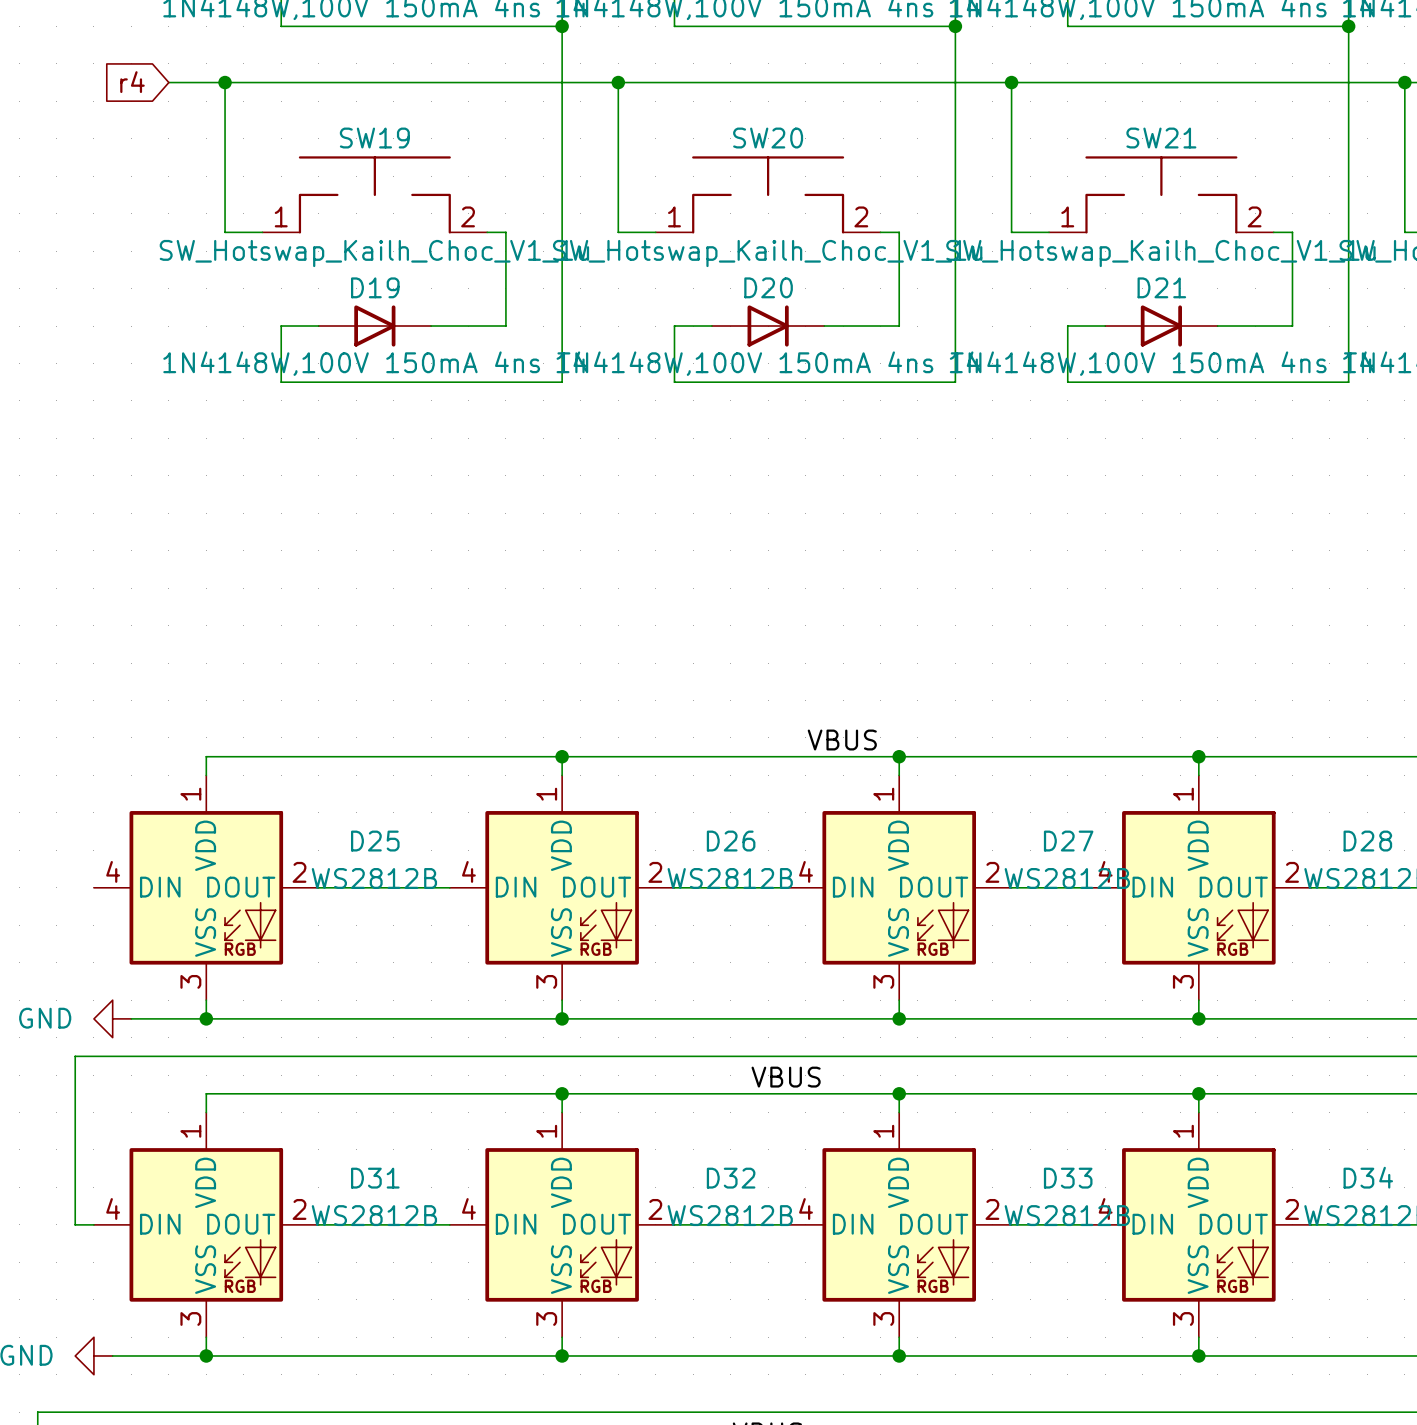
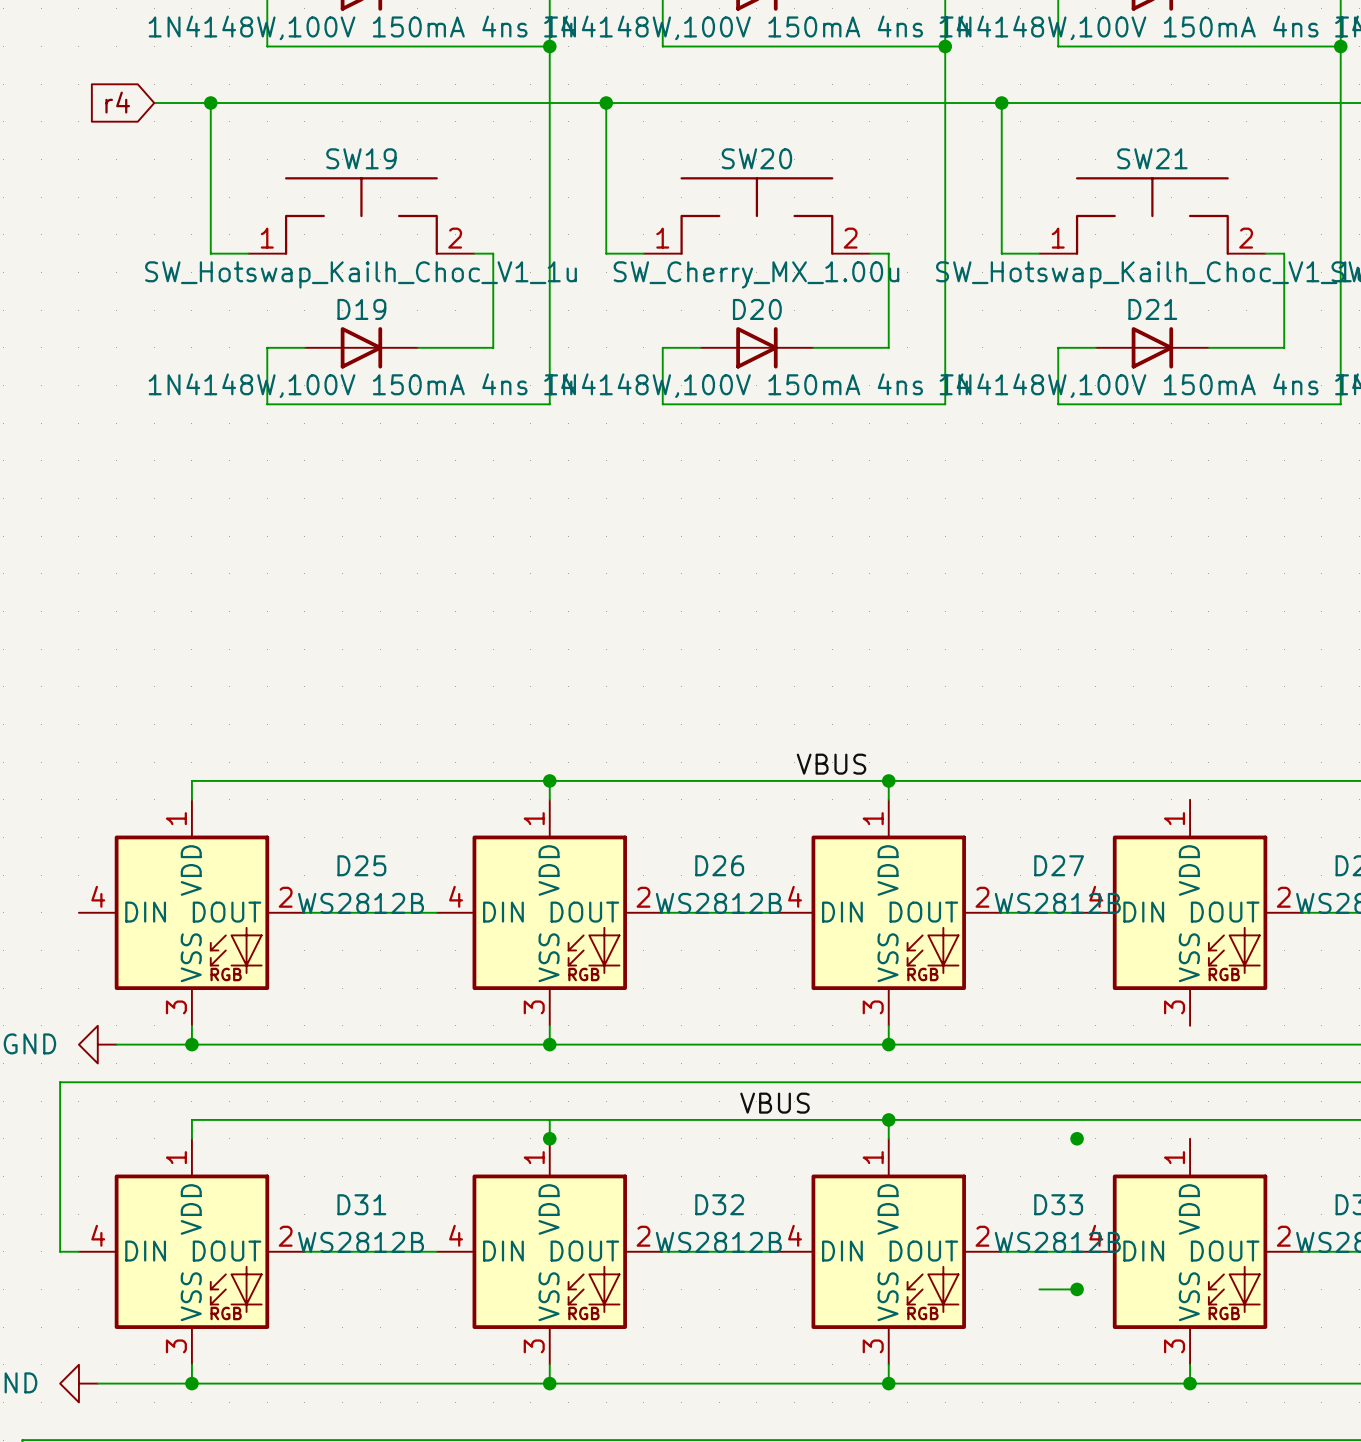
SW20 value: SW_Hotswap_Kailh_Choc_V1_1u (767, 253) -> SW_Cherry_MX_1.00u (756, 274)
wire: (1198, 756) (1198, 775) -> none
junction: (1198, 756) -> none
wire: (1198, 1000) (1198, 1018) -> none
junction: (1198, 1018) -> none
junction position: (562, 1093) -> (549, 1138)
wire: (1198, 1093) (1198, 1112) -> none
junction: (1198, 1093) -> none
junction: none -> (1077, 1138)
wire: none -> (1039, 1289) (1077, 1289)
junction: none -> (1077, 1289)

